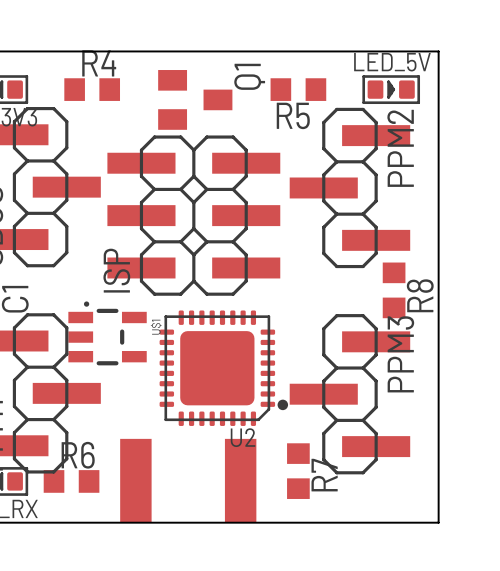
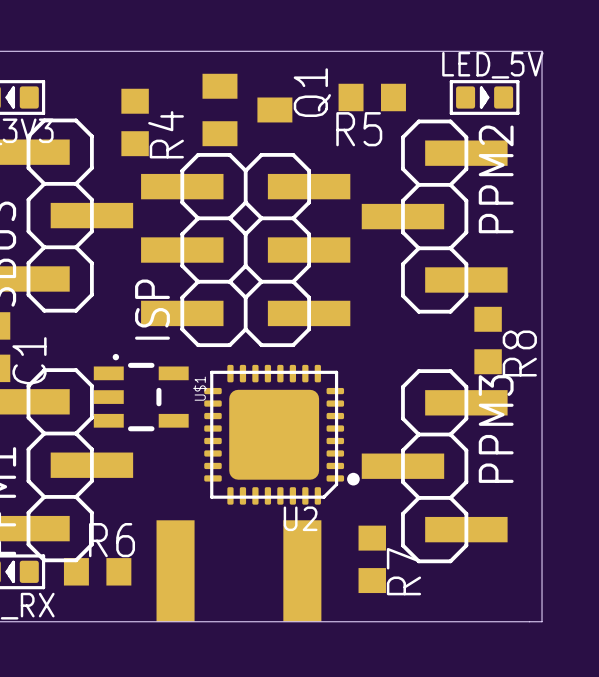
R4 rotation: 0° (92, 89) -> 90° clockwise (135, 122)

